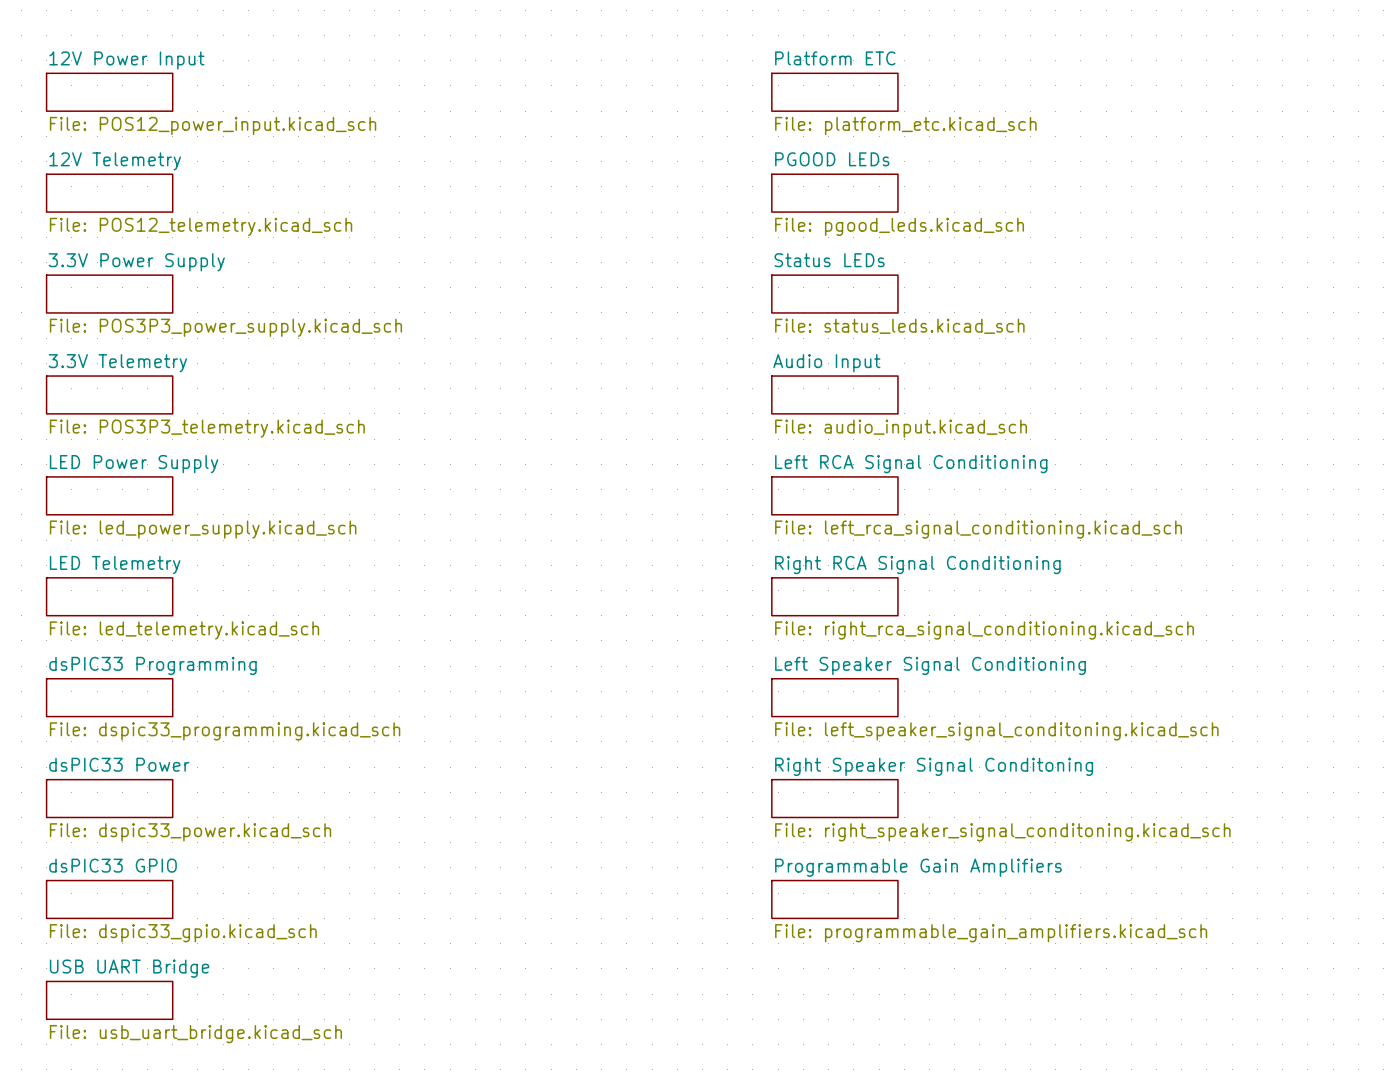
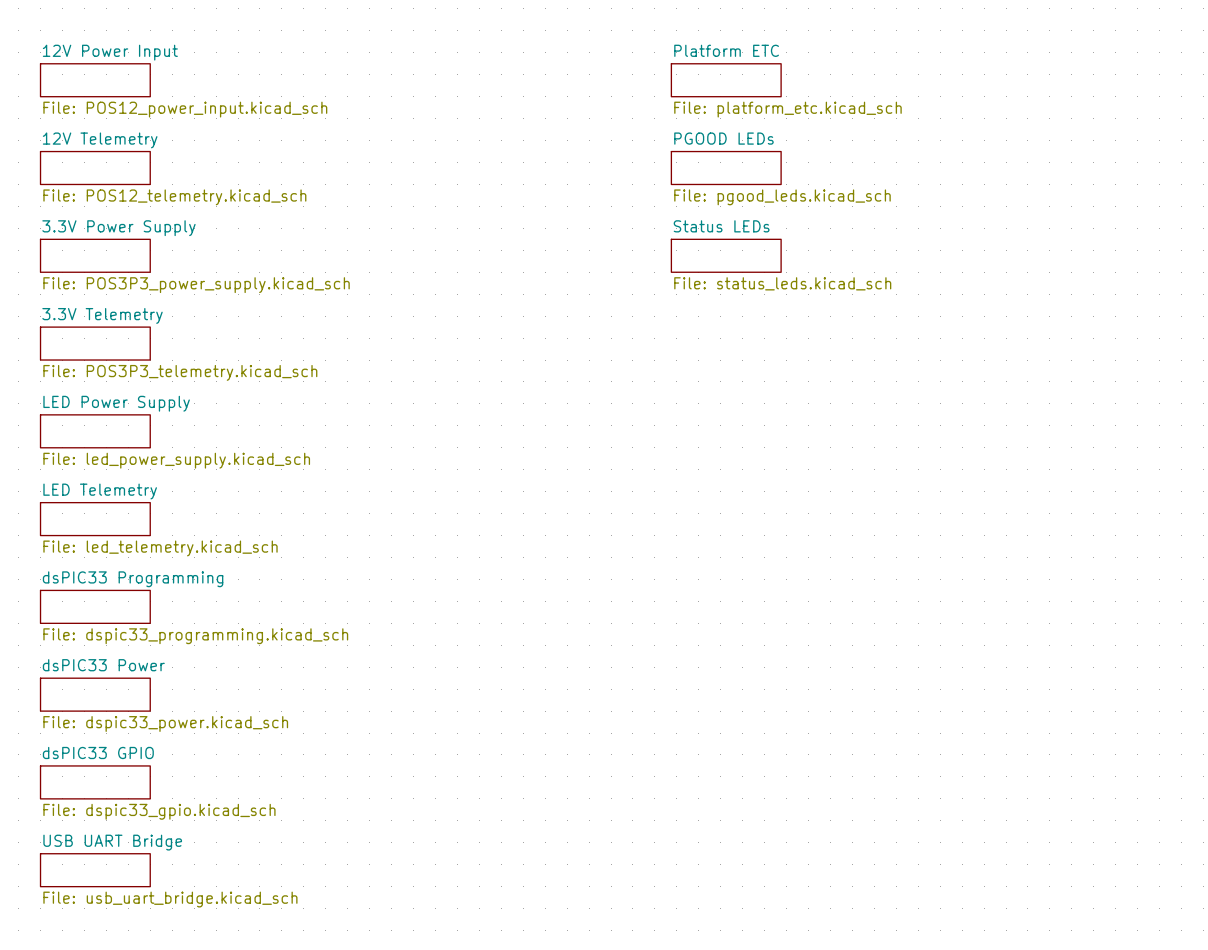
sheet Audio Input: File: audio_input.kicad_sch (834, 394) -> none
sheet Left RCA Signal Conditioning: File: left_rca_signal_conditioning.kicad_sch (834, 495) -> none
sheet Right RCA Signal Conditioning: File: right_rca_signal_conditioning.kicad_sch (834, 596) -> none
sheet Left Speaker Signal Conditioning: File: left_speaker_signal_conditoning.kicad_sch (834, 697) -> none
sheet Right Speaker Signal Conditoning: File: right_speaker_signal_conditoning.kicad_sch (834, 798) -> none
sheet Programmable Gain Amplifiers: File: programmable_gain_amplifiers.kicad_sch (834, 899) -> none

